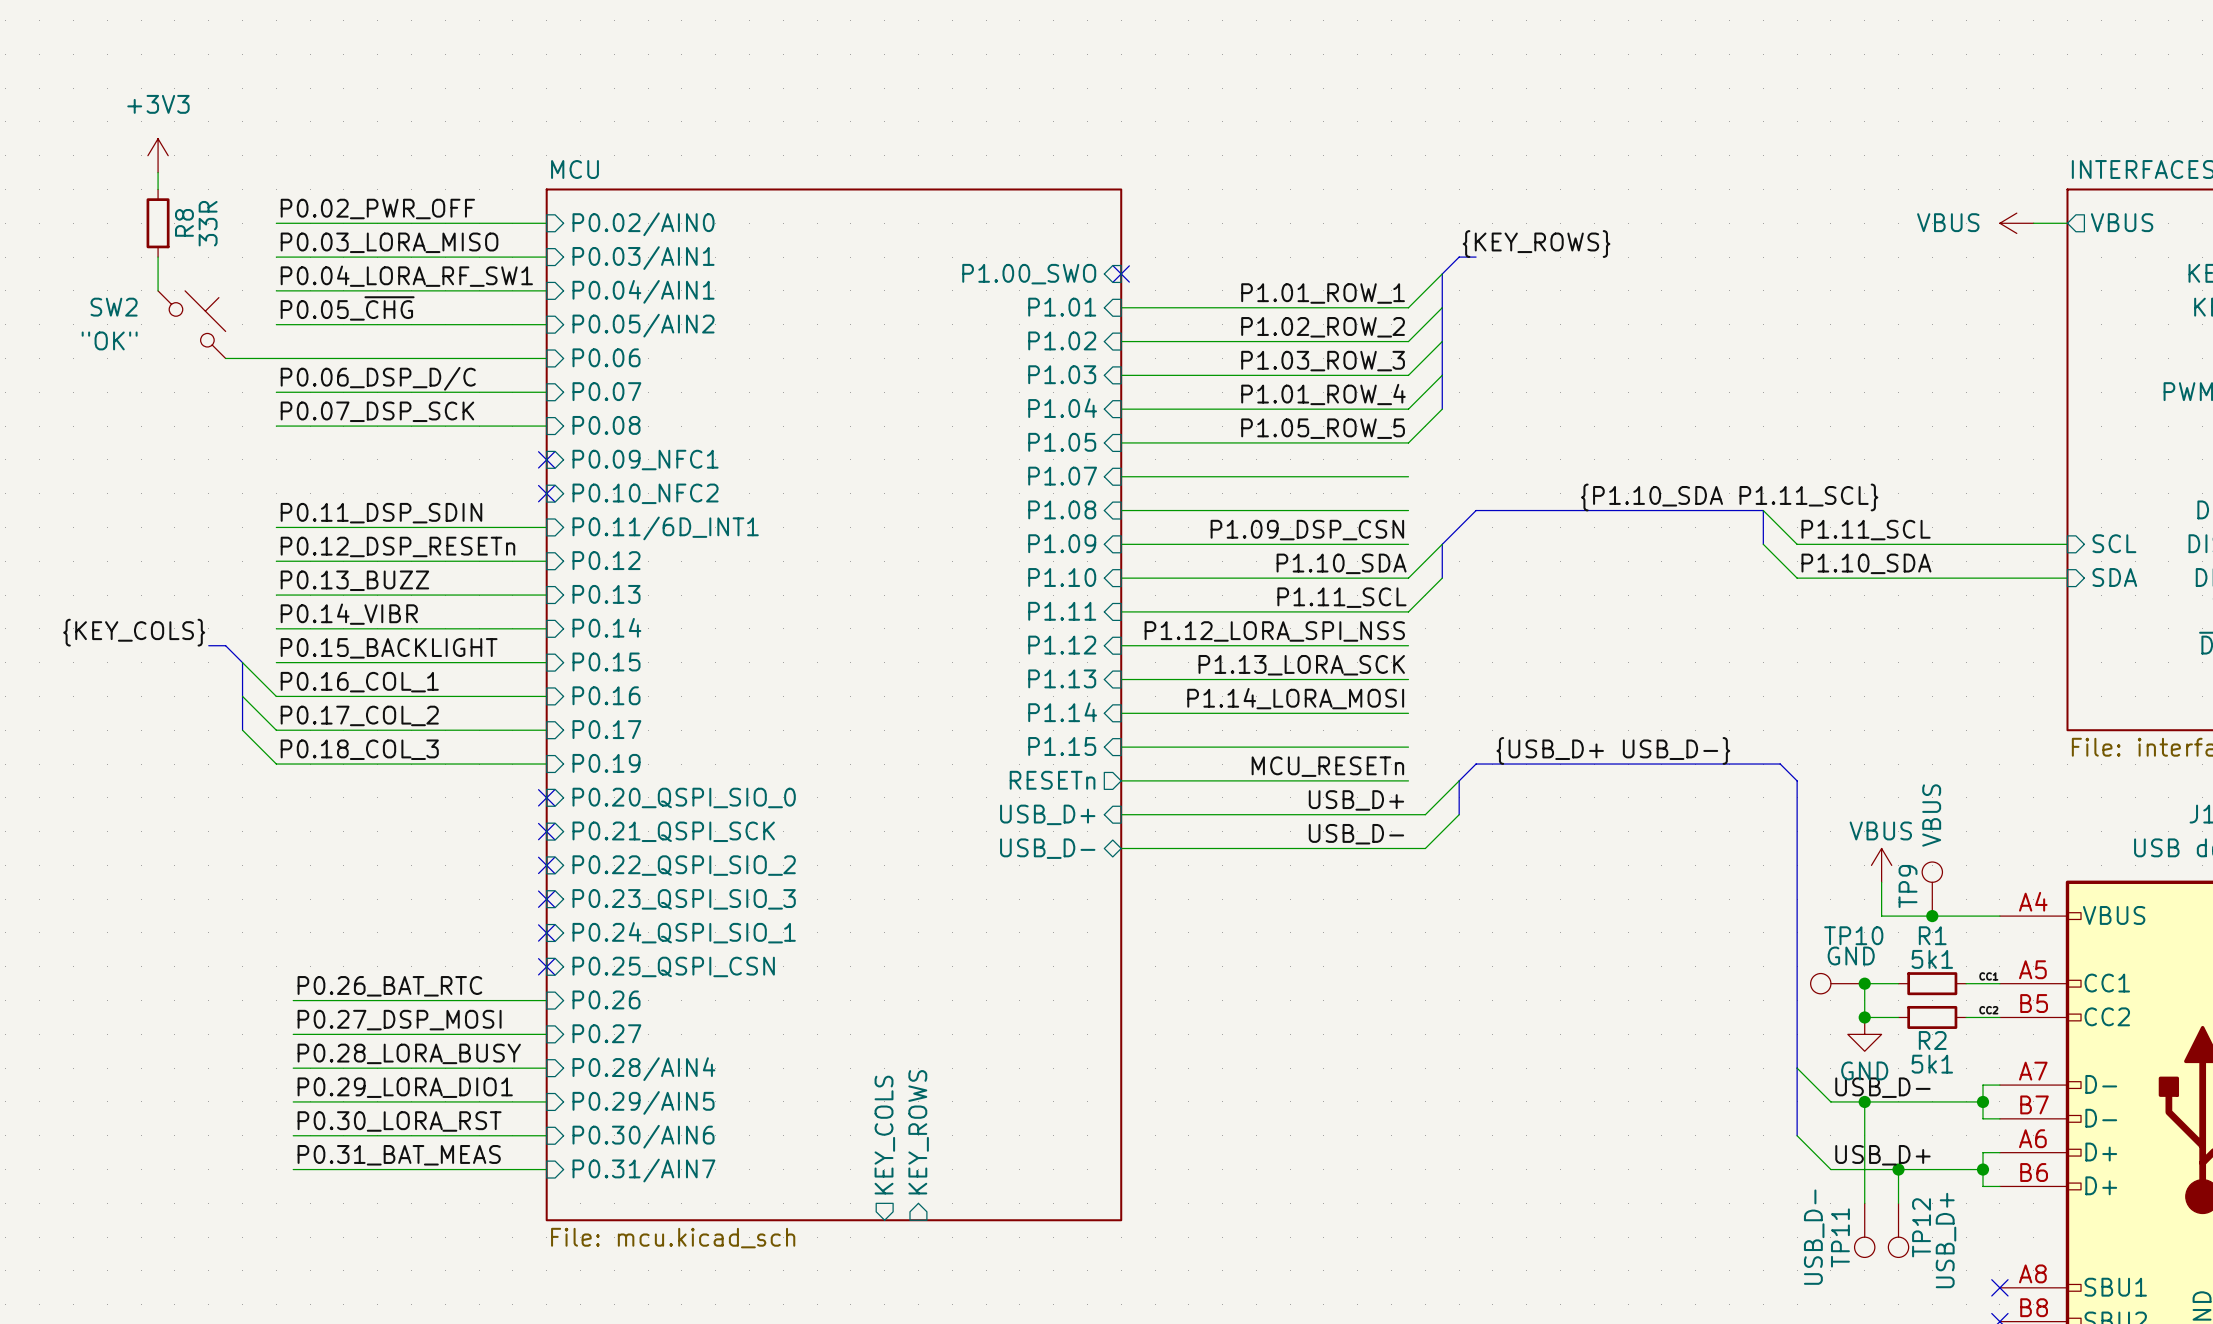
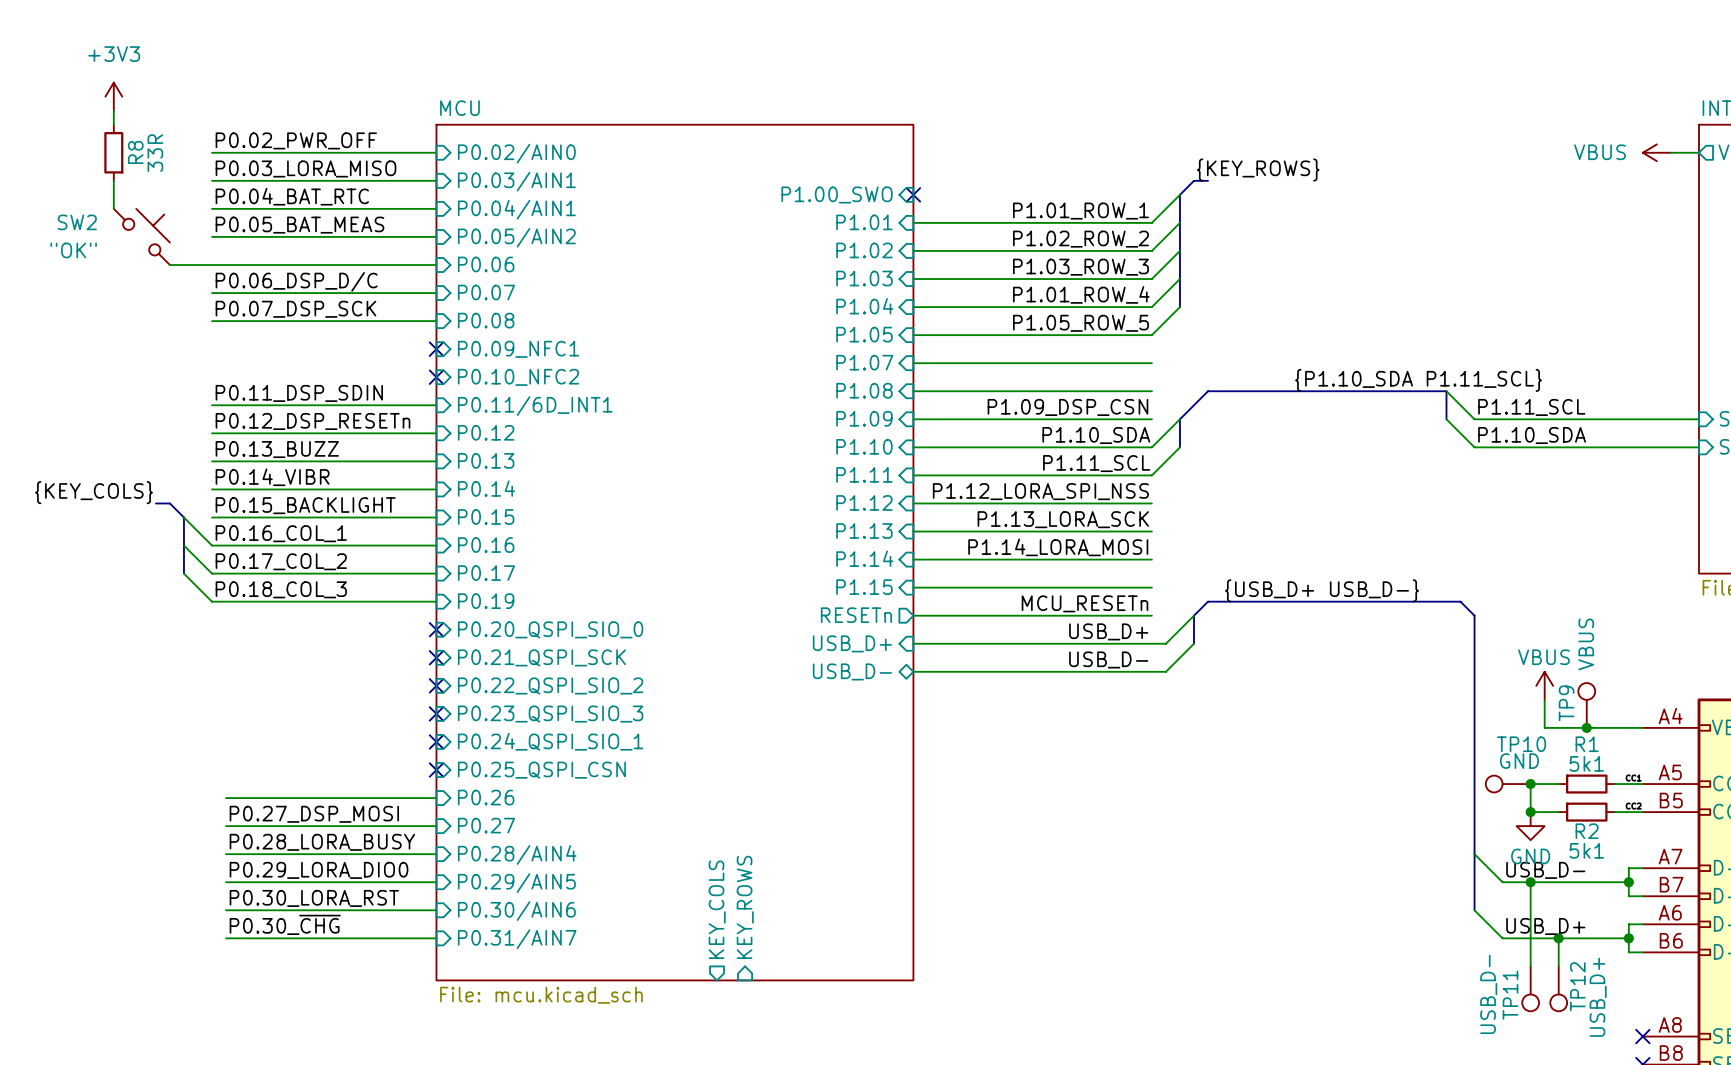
label: P0.04_LORA_RF_SW1 (406, 276) -> P0.04_BAT_RTC (292, 196)
label: P0.05_~{CHG} (347, 308) -> P0.05_BAT_MEAS (299, 225)
label: P0.26_BAT_RTC (389, 986) -> none
label: P0.29_LORA_DIO1 (405, 1087) -> P0.29_LORA_DIO0 (319, 870)
label: P0.31_BAT_MEAS (399, 1155) -> P0.30_~{CHG} (285, 924)

